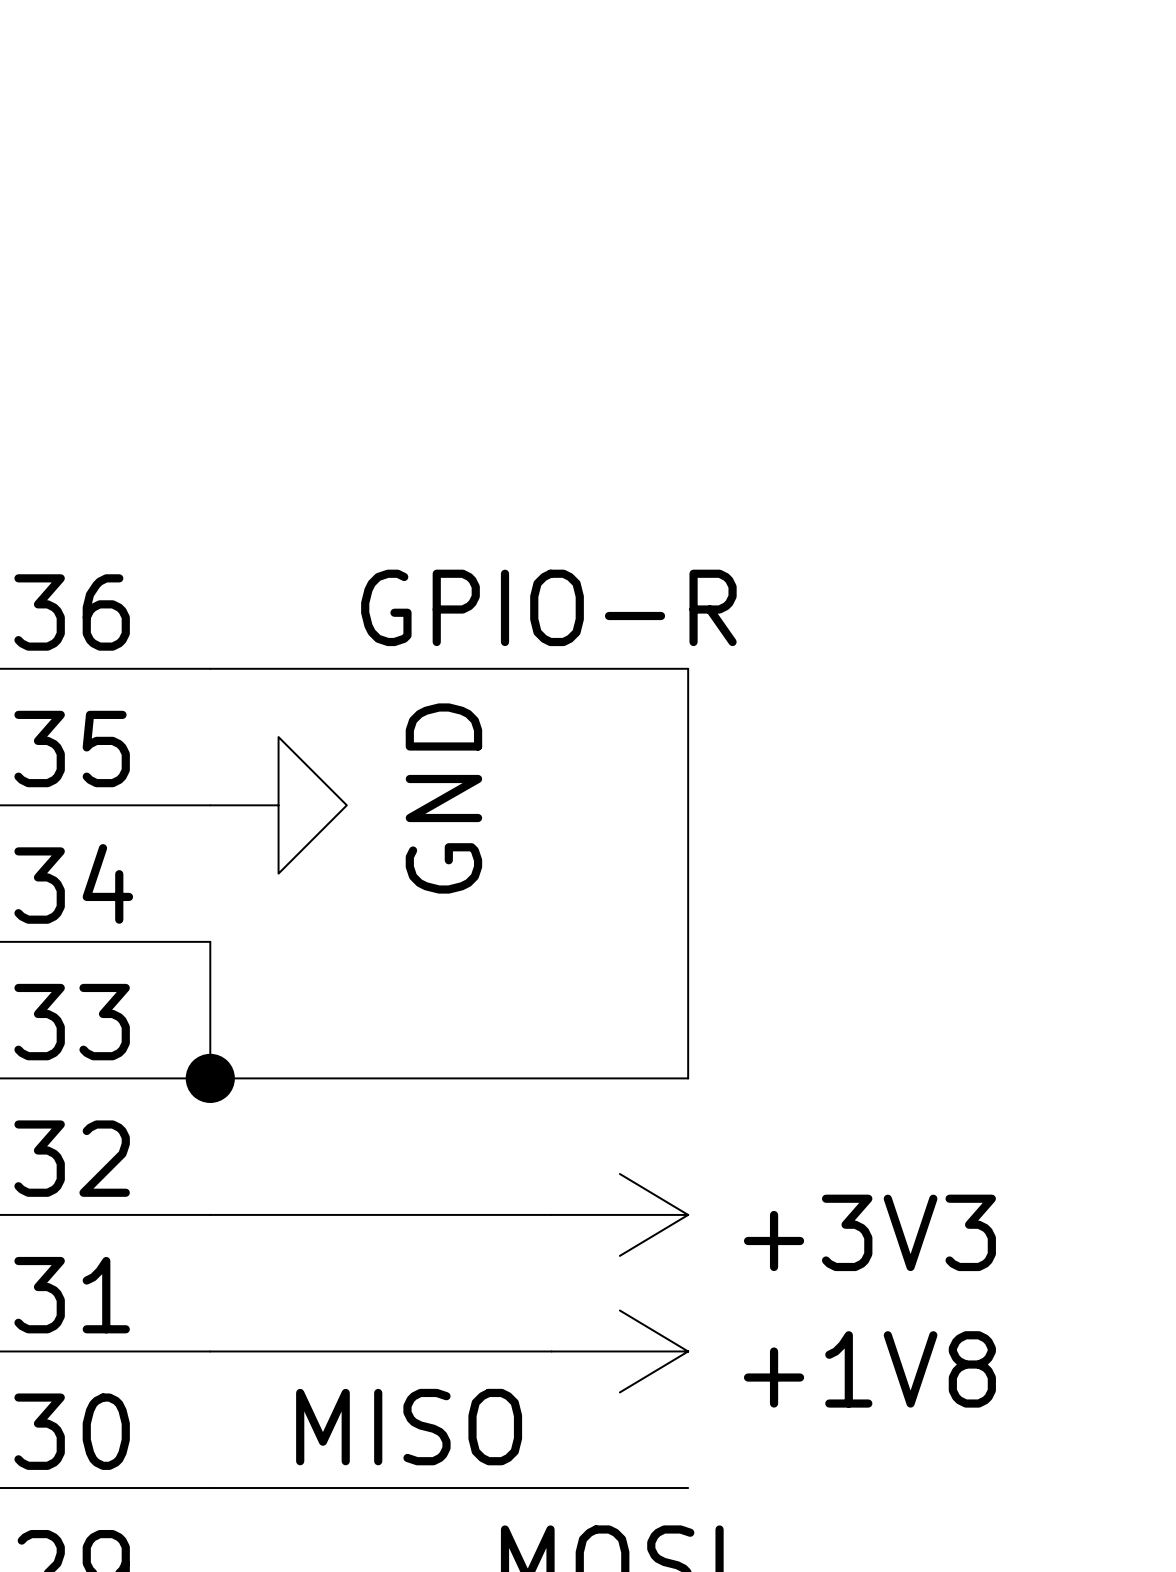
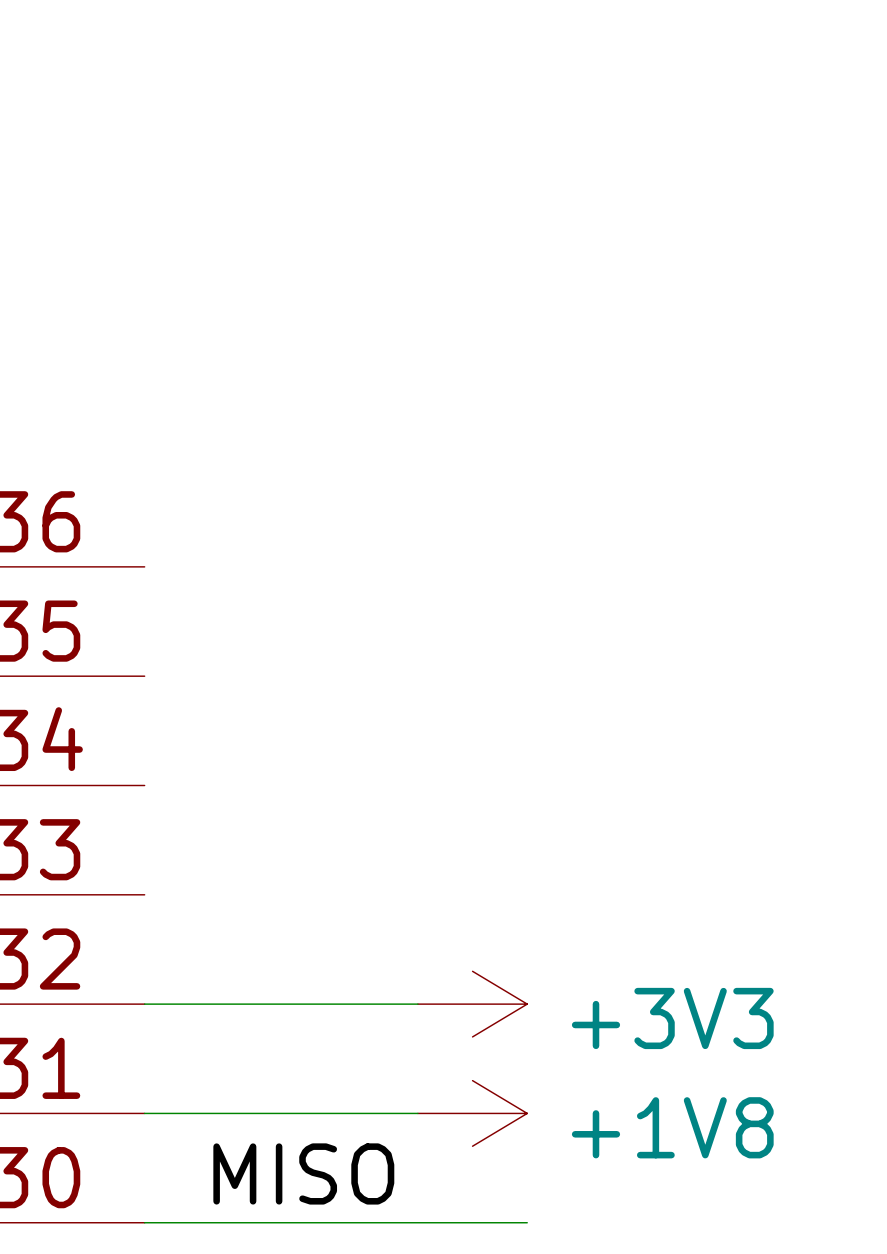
label: GPIO-R (548, 607) -> none
wire: (210, 668) (688, 668) (688, 1078) (210, 1078) (210, 941) -> none
power symbol: GND (278, 805) -> none
junction: (210, 1078) -> none

